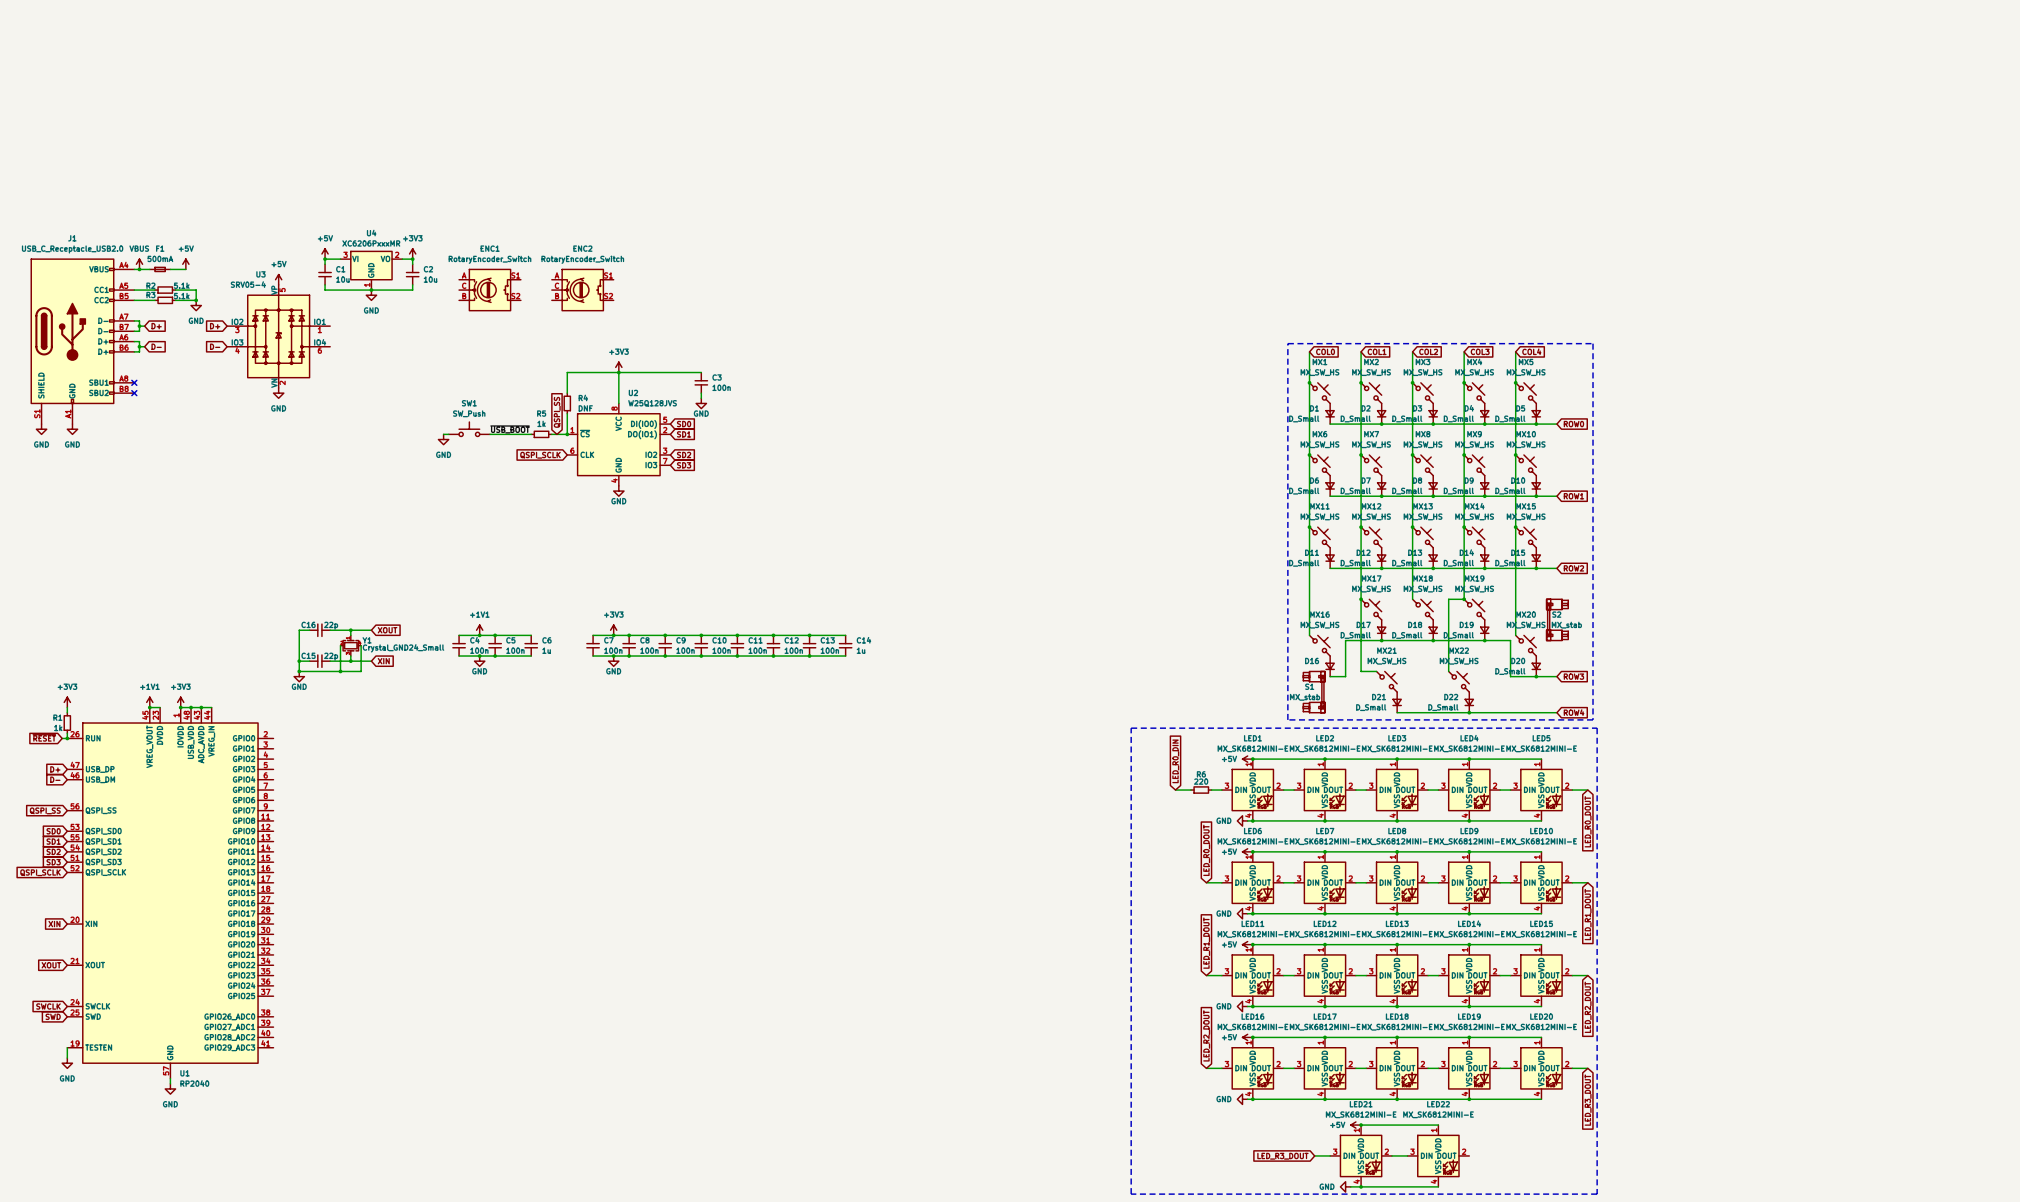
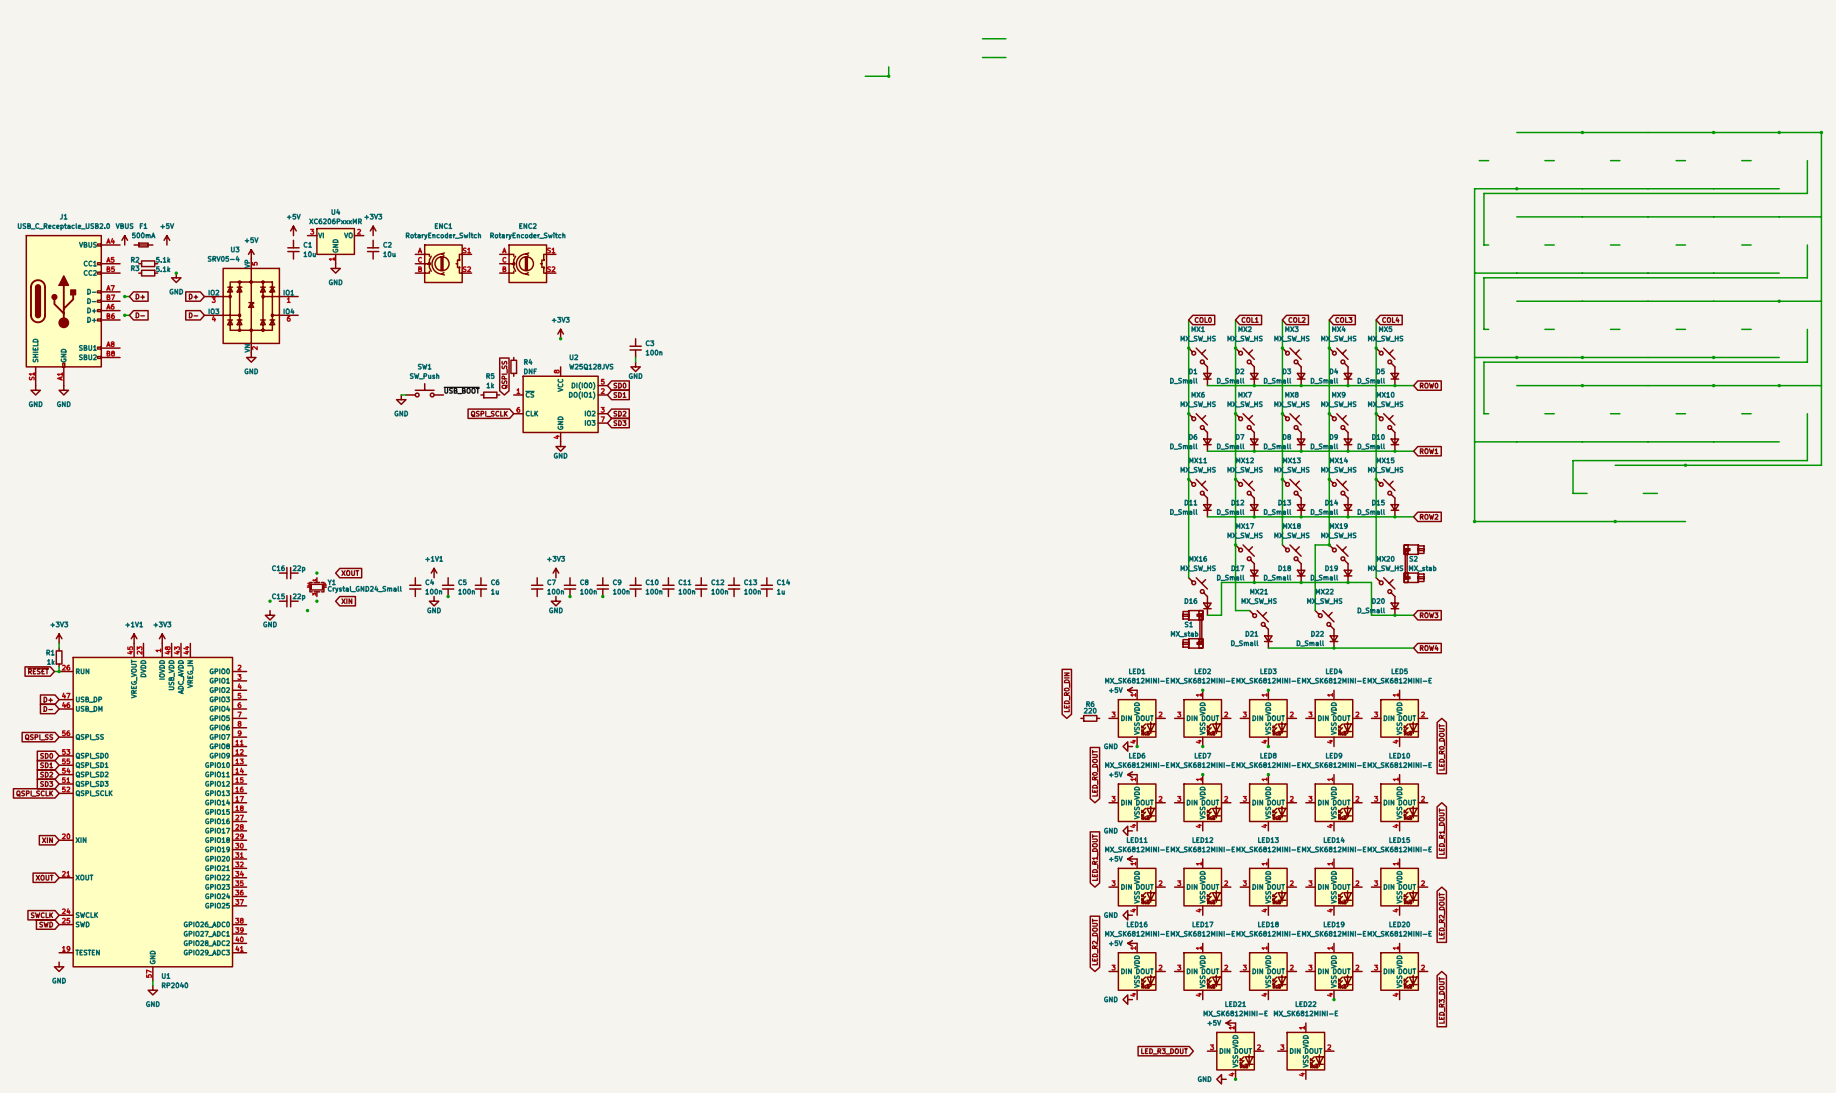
wire: none -> (982, 38) (1005, 38)
wire: none -> (982, 57) (1005, 57)
wire: none -> (888, 66) (888, 76) (865, 76)
junction: none -> (888, 76)
wire: none -> (1516, 132) (1821, 132) (1821, 465) (1615, 465)
junction: none -> (1582, 132)
junction: none -> (1713, 132)
junction: none -> (1779, 132)
junction: none -> (1821, 132)
wire: none -> (1479, 160) (1488, 160)
wire: none -> (1544, 160) (1554, 160)
wire: none -> (1610, 160) (1619, 160)
wire: none -> (1676, 160) (1685, 160)
wire: none -> (1741, 160) (1751, 160)
wire: none -> (1807, 160) (1807, 193) (1483, 193) (1483, 244) (1488, 244)
junction: none -> (1516, 188)
wire: none -> (1779, 188) (1474, 188) (1474, 521) (1685, 521)
wire: none -> (1516, 216) (1821, 216)
junction: (325, 259) -> none
wire: (340, 259) (325, 259) (325, 264) -> none
wire: (402, 259) (412, 259) (412, 264) -> none
junction: (412, 259) -> none
wire: (134, 269) (149, 269) -> none
junction: (139, 269) -> none
wire: (170, 269) (185, 269) -> none
wire: none -> (1544, 244) (1554, 244)
wire: none -> (1610, 244) (1619, 244)
wire: none -> (1676, 244) (1685, 244)
wire: none -> (1741, 244) (1751, 244)
wire: none -> (1807, 244) (1807, 277) (1483, 277) (1483, 329) (1488, 329)
wire: (325, 284) (325, 290) (412, 290) (412, 284) -> none
wire: (134, 290) (154, 290) -> none
wire: (175, 290) (196, 290) (196, 300) (175, 300) -> none
junction: (371, 290) -> none
wire: (134, 300) (154, 300) -> none
wire: none -> (1474, 273) (1779, 273)
wire: (134, 320) (139, 320) (139, 331) (134, 331) -> none
wire: none -> (1516, 301) (1821, 301)
junction: none -> (1779, 301)
wire: (134, 341) (139, 341) (139, 351) (134, 351) -> none
line: (1287, 343) (1593, 343) (1593, 719) (1287, 719) (1287, 343) -> none
wire: none -> (1544, 329) (1554, 329)
wire: none -> (1610, 329) (1619, 329)
wire: none -> (1676, 329) (1685, 329)
wire: none -> (1741, 329) (1751, 329)
wire: none -> (1807, 329) (1807, 362) (1483, 362) (1483, 413) (1488, 413)
wire: (618, 372) (618, 403) -> none
wire: (701, 372) (567, 372) (567, 393) -> none
no-connect mark: (134, 382) -> none
no-connect mark: (134, 393) -> none
wire: none -> (1474, 357) (1779, 357)
junction: none -> (1516, 357)
junction: none -> (1582, 357)
junction: none -> (1713, 357)
wire: (567, 413) (567, 434) (551, 434) -> none
wire: none -> (1516, 385) (1821, 385)
junction: none -> (1582, 385)
junction: none -> (1713, 385)
junction: none -> (1779, 385)
wire: (489, 434) (531, 434) -> none
junction: (567, 434) -> none
wire: none -> (1544, 413) (1554, 413)
wire: none -> (1610, 413) (1619, 413)
wire: none -> (1676, 413) (1685, 413)
wire: none -> (1741, 413) (1751, 413)
wire: none -> (1807, 413) (1807, 460) (1573, 460) (1573, 493) (1587, 493)
wire: none -> (1474, 441) (1779, 441)
junction: none -> (1685, 465)
wire: none -> (1643, 493) (1657, 493)
junction: none -> (1474, 521)
junction: none -> (1615, 521)
wire: (309, 630) (299, 630) (299, 671) (361, 671) (361, 645) -> none
wire: (330, 630) (371, 630) -> none
wire: (350, 630) (350, 635) -> none
wire: (459, 635) (531, 635) -> none
junction: (479, 635) -> none
junction: (495, 635) -> none
wire: (593, 635) (845, 635) -> none
junction: (613, 635) -> none
junction: (629, 635) -> none
junction: (665, 635) -> none
junction: (701, 635) -> none
junction: (737, 635) -> none
junction: (773, 635) -> none
junction: (809, 635) -> none
wire: (340, 645) (340, 671) -> none
wire: (350, 656) (350, 661) -> none
wire: (459, 656) (531, 656) -> none
junction: (479, 656) -> none
wire: (593, 656) (845, 656) -> none
junction: (613, 656) -> none
junction: (701, 656) -> none
junction: (737, 656) -> none
junction: (773, 656) -> none
junction: (809, 656) -> none
wire: (299, 661) (309, 661) -> none
wire: (330, 661) (371, 661) -> none
junction: (299, 671) -> none
wire: (149, 707) (160, 707) -> none
junction: (149, 707) -> none
wire: (180, 707) (211, 707) -> none
junction: (180, 707) -> none
junction: (191, 707) -> none
junction: (201, 707) -> none
line: (1131, 728) (1597, 728) (1597, 1194) (1131, 1194) (1131, 728) -> none
wire: (1252, 759) (1541, 759) -> none
junction: (1252, 759) -> none
junction: (1469, 759) -> none
wire: (1175, 790) (1190, 790) -> none
wire: (1211, 790) (1221, 790) -> none
wire: (1283, 790) (1294, 790) -> none
wire: (1355, 790) (1366, 790) -> none
wire: (1428, 790) (1438, 790) -> none
wire: (1500, 790) (1510, 790) -> none
wire: (1572, 790) (1587, 790) -> none
wire: (1247, 820) (1541, 820) -> none
junction: (1469, 820) -> none
wire: (1252, 851) (1541, 851) -> none
junction: (1252, 851) -> none
junction: (1469, 851) -> none
wire: (1206, 882) (1221, 882) -> none
wire: (1283, 882) (1294, 882) -> none
wire: (1355, 882) (1366, 882) -> none
wire: (1428, 882) (1438, 882) -> none
wire: (1500, 882) (1510, 882) -> none
wire: (1572, 882) (1587, 882) -> none
wire: (1247, 913) (1541, 913) -> none
junction: (1252, 913) -> none
junction: (1324, 913) -> none
junction: (1397, 913) -> none
junction: (1469, 913) -> none
wire: (1252, 944) (1541, 944) -> none
junction: (1252, 944) -> none
junction: (1324, 944) -> none
junction: (1397, 944) -> none
junction: (1469, 944) -> none
wire: (1206, 975) (1221, 975) -> none
wire: (1283, 975) (1294, 975) -> none
wire: (1355, 975) (1366, 975) -> none
wire: (1428, 975) (1438, 975) -> none
wire: (1500, 975) (1510, 975) -> none
wire: (1572, 975) (1587, 975) -> none
wire: (1247, 1006) (1541, 1006) -> none
junction: (1252, 1006) -> none
junction: (1324, 1006) -> none
junction: (1397, 1006) -> none
junction: (1469, 1006) -> none
wire: (1252, 1037) (1541, 1037) -> none
junction: (1252, 1037) -> none
junction: (1324, 1037) -> none
junction: (1397, 1037) -> none
junction: (1469, 1037) -> none
wire: (67, 1047) (67, 1058) -> none
wire: (1206, 1068) (1221, 1068) -> none
wire: (1283, 1068) (1294, 1068) -> none
wire: (1355, 1068) (1366, 1068) -> none
wire: (1428, 1068) (1438, 1068) -> none
wire: (1500, 1068) (1510, 1068) -> none
wire: (1572, 1068) (1587, 1068) -> none
wire: (1247, 1099) (1541, 1099) -> none
junction: (1252, 1099) -> none
junction: (1324, 1099) -> none
junction: (1397, 1099) -> none
wire: (1361, 1125) (1438, 1125) -> none
junction: (1361, 1125) -> none
wire: (1314, 1155) (1330, 1155) -> none
wire: (1391, 1155) (1407, 1155) -> none
wire: (1350, 1186) (1438, 1186) -> none

